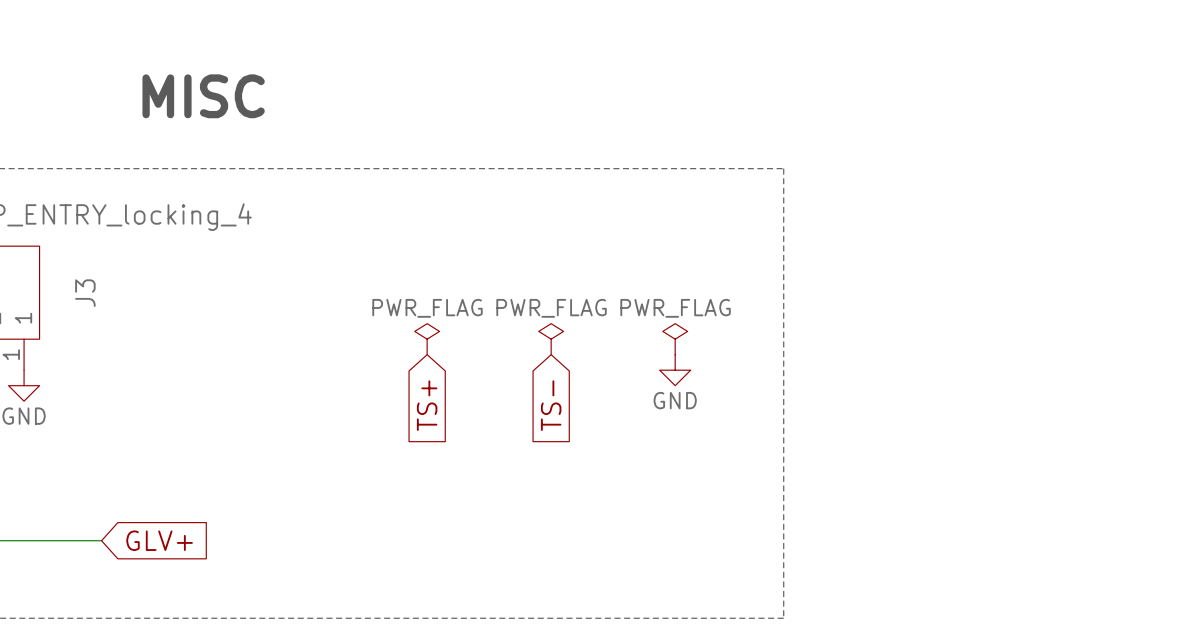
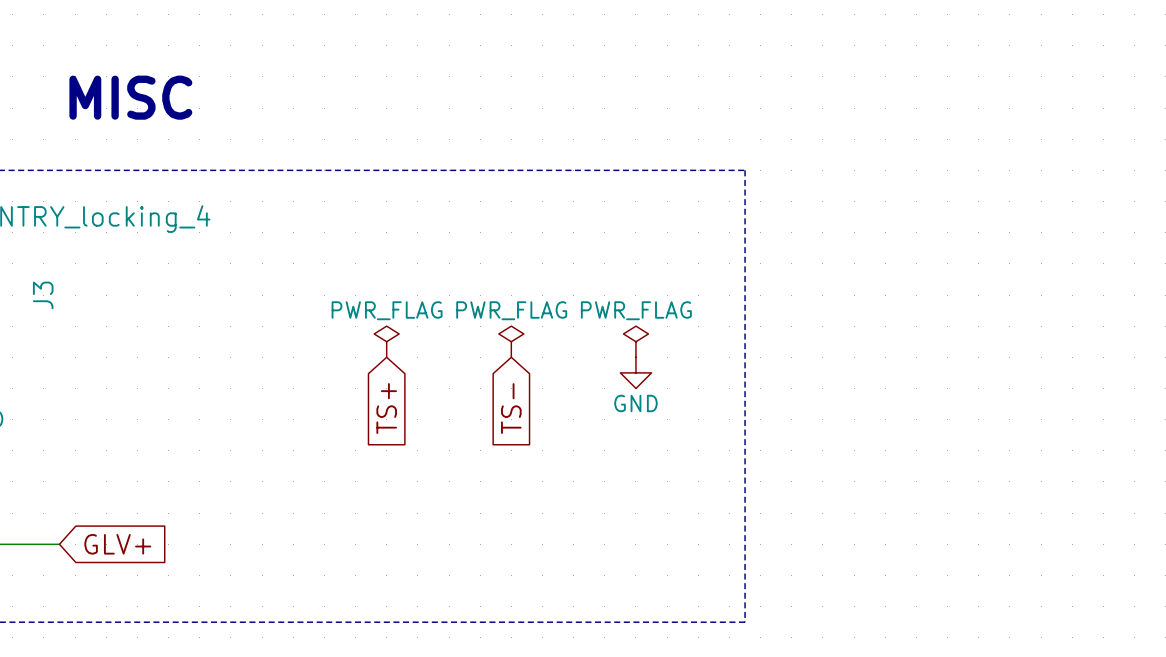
text position: MISC (203, 96) -> MISC (130, 97)

